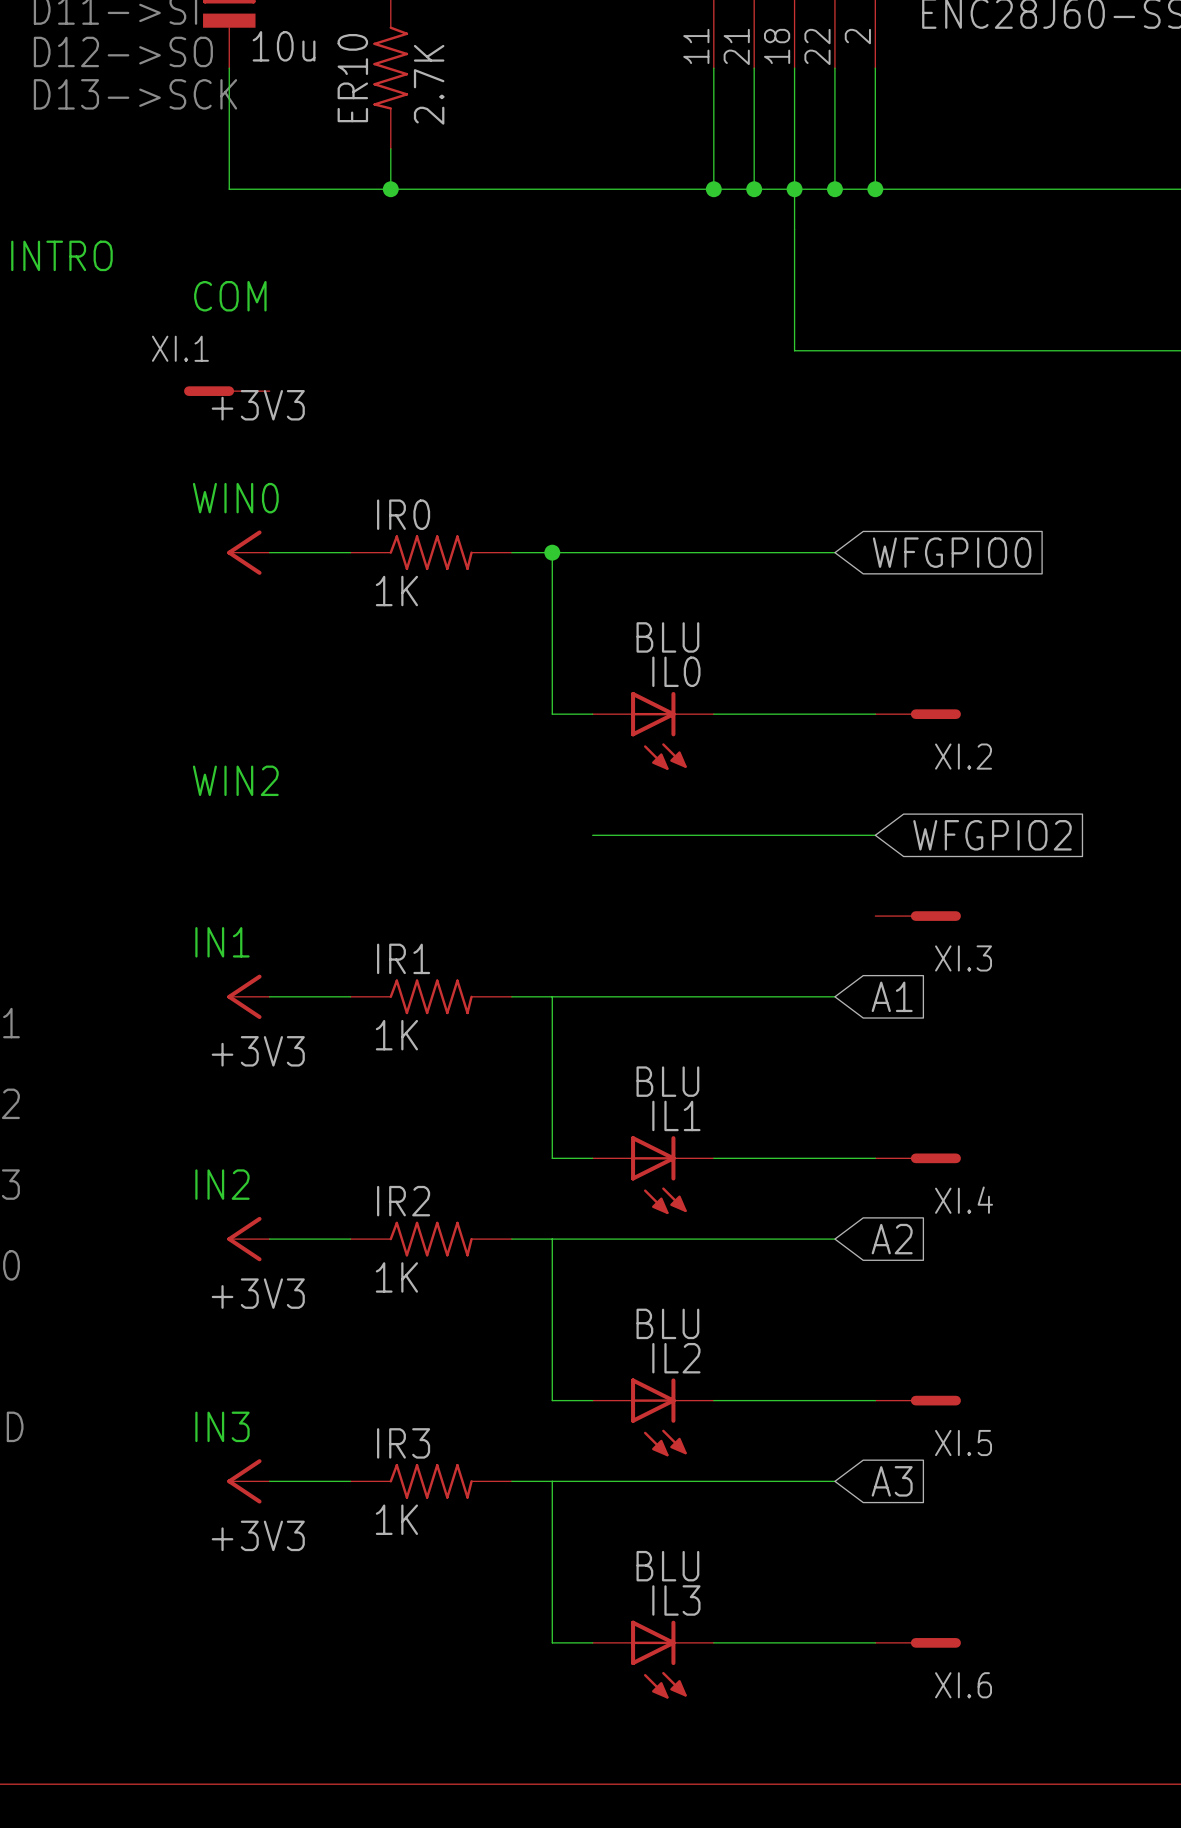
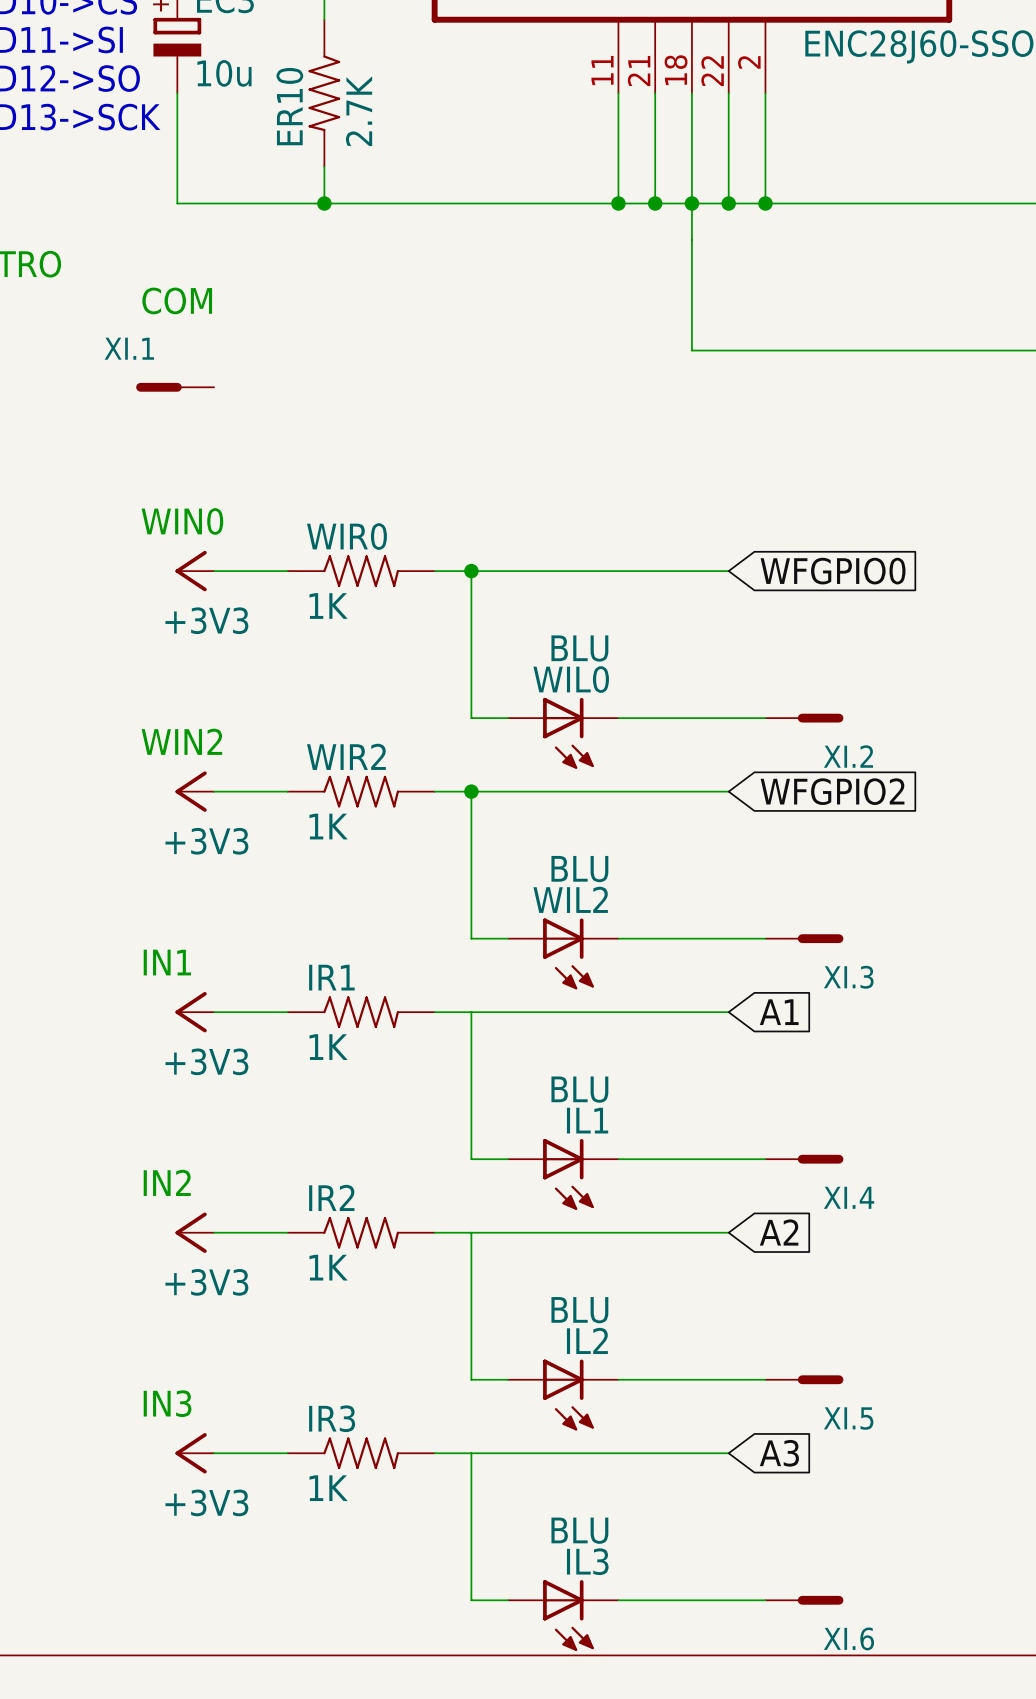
power symbol text position: +3V3 (258, 405) -> +3V3 (206, 620)
text position: WIN0 (235, 498) -> WIN0 (182, 521)
power symbol position: +3V3 (248, 552) -> +3V3 (194, 571)
wire: (269, 552) (350, 552) -> (214, 571) (287, 571)
IR0: 1K (431, 552) -> none
wire: (511, 552) (834, 552) -> (434, 571) (728, 571)
wire: (552, 552) (552, 593) -> none
junction position: (552, 552) -> (471, 571)
global label position: WFGPIO0 (952, 552) -> WFGPIO0 (833, 571)
WIR0: none -> 1K (361, 571)
wire: (552, 714) (592, 714) -> (471, 681) (471, 718) (508, 718)
wire: (713, 714) (875, 714) -> (618, 718) (765, 718)
XI.2 position: (918, 714) -> (804, 718)
IL0: BLU (653, 730) -> none
WIL0: none -> BLU (563, 733)
power symbol: none -> +3V3 (194, 791)
wire: none -> (214, 791) (287, 791)
WIR2: none -> 1K (361, 791)
wire: none -> (434, 791) (508, 791)
wire: none -> (471, 791) (471, 938)
junction: none -> (471, 791)
wire: (834, 835) (875, 835) -> (728, 938) (765, 938)
global label position: WFGPIO2 (992, 835) -> WFGPIO2 (832, 791)
XI.3 position: (918, 916) -> (804, 938)
text position: IN1 (222, 942) -> IN1 (167, 962)
power symbol: +3V3 (248, 996) -> none
wire: (269, 996) (350, 996) -> (214, 1012) (287, 1012)
IR1 position: (431, 996) -> (361, 1012)
wire: (511, 996) (552, 996) (552, 1077) -> none
global label position: A1 (892, 996) -> A1 (779, 1012)
WIL2: none -> BLU (563, 953)
power symbol: none -> +3V3 (194, 1012)
wire: none -> (434, 1012) (728, 1012)
wire: (552, 1158) (592, 1158) -> (471, 1085) (471, 1159)
wire: (713, 1158) (875, 1158) -> none
XI.4 position: (918, 1158) -> (804, 1159)
IL1 position: (653, 1175) -> (563, 1174)
text position: IN2 (222, 1184) -> IN2 (167, 1182)
power symbol: +3V3 (248, 1239) -> none
wire: (269, 1239) (350, 1239) -> (214, 1232) (287, 1232)
IR2 position: (431, 1239) -> (361, 1232)
wire: (511, 1239) (552, 1239) (552, 1319) -> none
wire: none -> (728, 1159) (765, 1159)
global label position: A2 (892, 1239) -> A2 (779, 1232)
power symbol: none -> +3V3 (194, 1232)
wire: none -> (434, 1232) (728, 1232)
wire: (552, 1400) (592, 1400) -> (471, 1306) (471, 1379)
wire: (713, 1400) (875, 1400) -> none
XI.5 position: (918, 1400) -> (804, 1379)
IL2 position: (653, 1417) -> (563, 1395)
text position: IN3 (222, 1426) -> IN3 (167, 1403)
power symbol: +3V3 (248, 1481) -> none
wire: (269, 1481) (350, 1481) -> (214, 1453) (287, 1453)
IR3 position: (431, 1481) -> (361, 1453)
wire: (511, 1481) (552, 1481) (552, 1562) -> none
wire: none -> (728, 1379) (765, 1379)
global label position: A3 (892, 1481) -> A3 (779, 1453)
power symbol: none -> +3V3 (194, 1453)
wire: none -> (434, 1453) (728, 1453)
wire: (552, 1642) (592, 1642) -> (471, 1526) (471, 1600) (508, 1600)
wire: (713, 1642) (875, 1642) -> (618, 1600) (765, 1600)
XI.6 position: (918, 1642) -> (804, 1600)
IL3 position: (653, 1659) -> (563, 1615)

